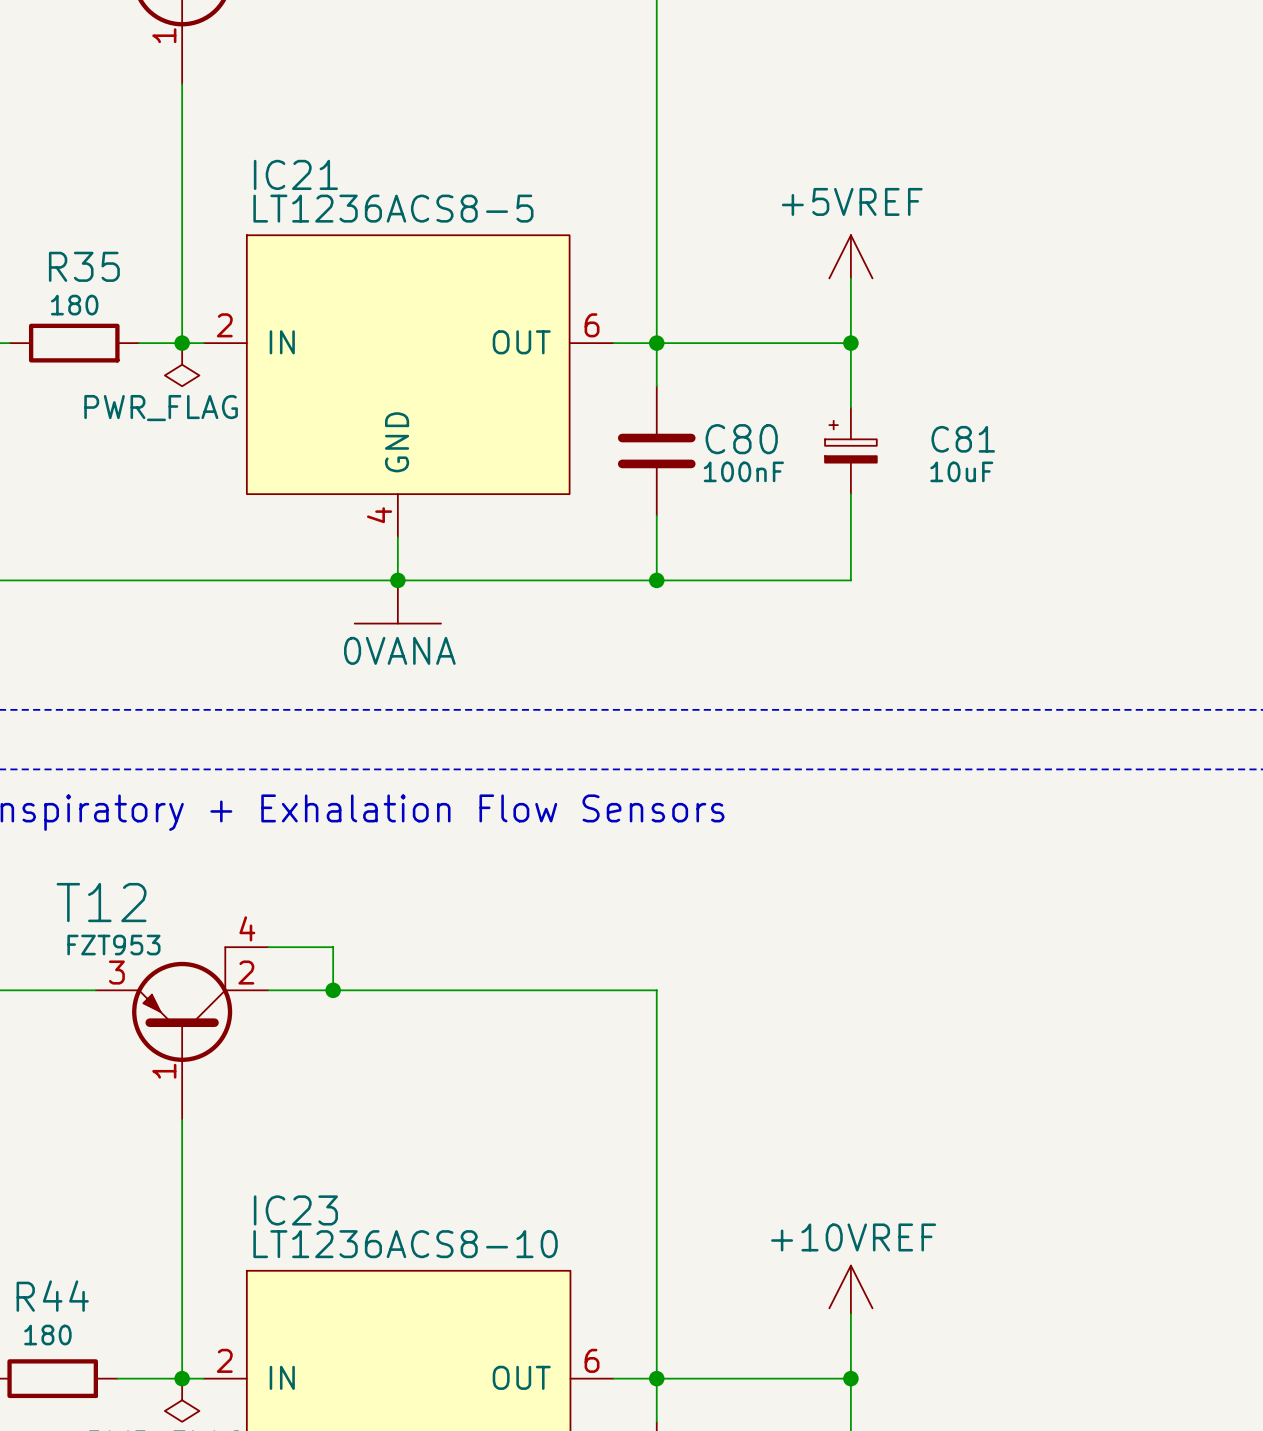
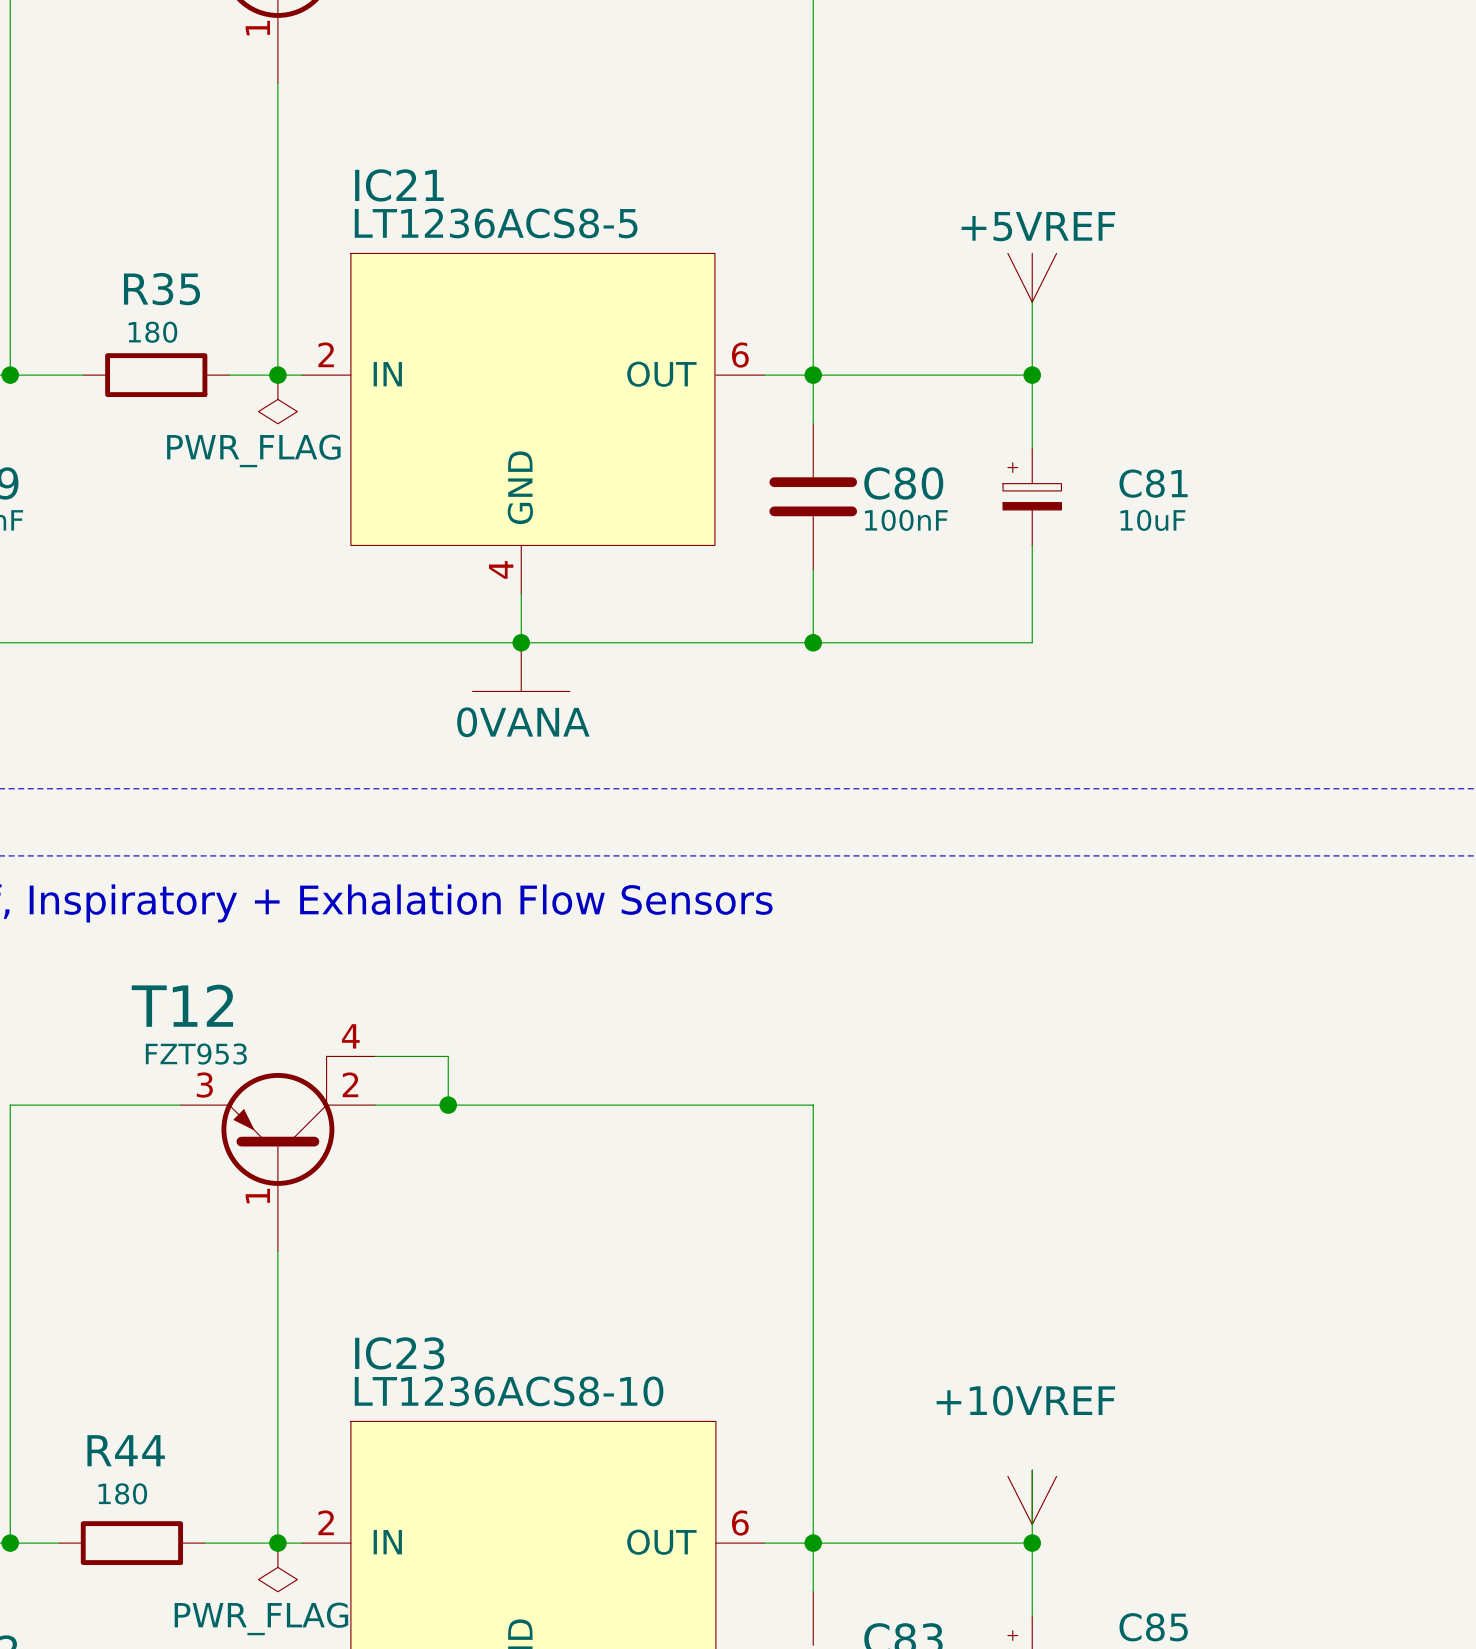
power symbol rotation: 0° (850, 256) -> 180° (1032, 277)
power symbol text position: +10VREF (853, 1237) -> +10VREF (1025, 1400)
power symbol rotation: 0° (850, 1286) -> 180° (1032, 1500)
power symbol position: +10VREF (850, 1289) -> +10VREF (1032, 1497)

